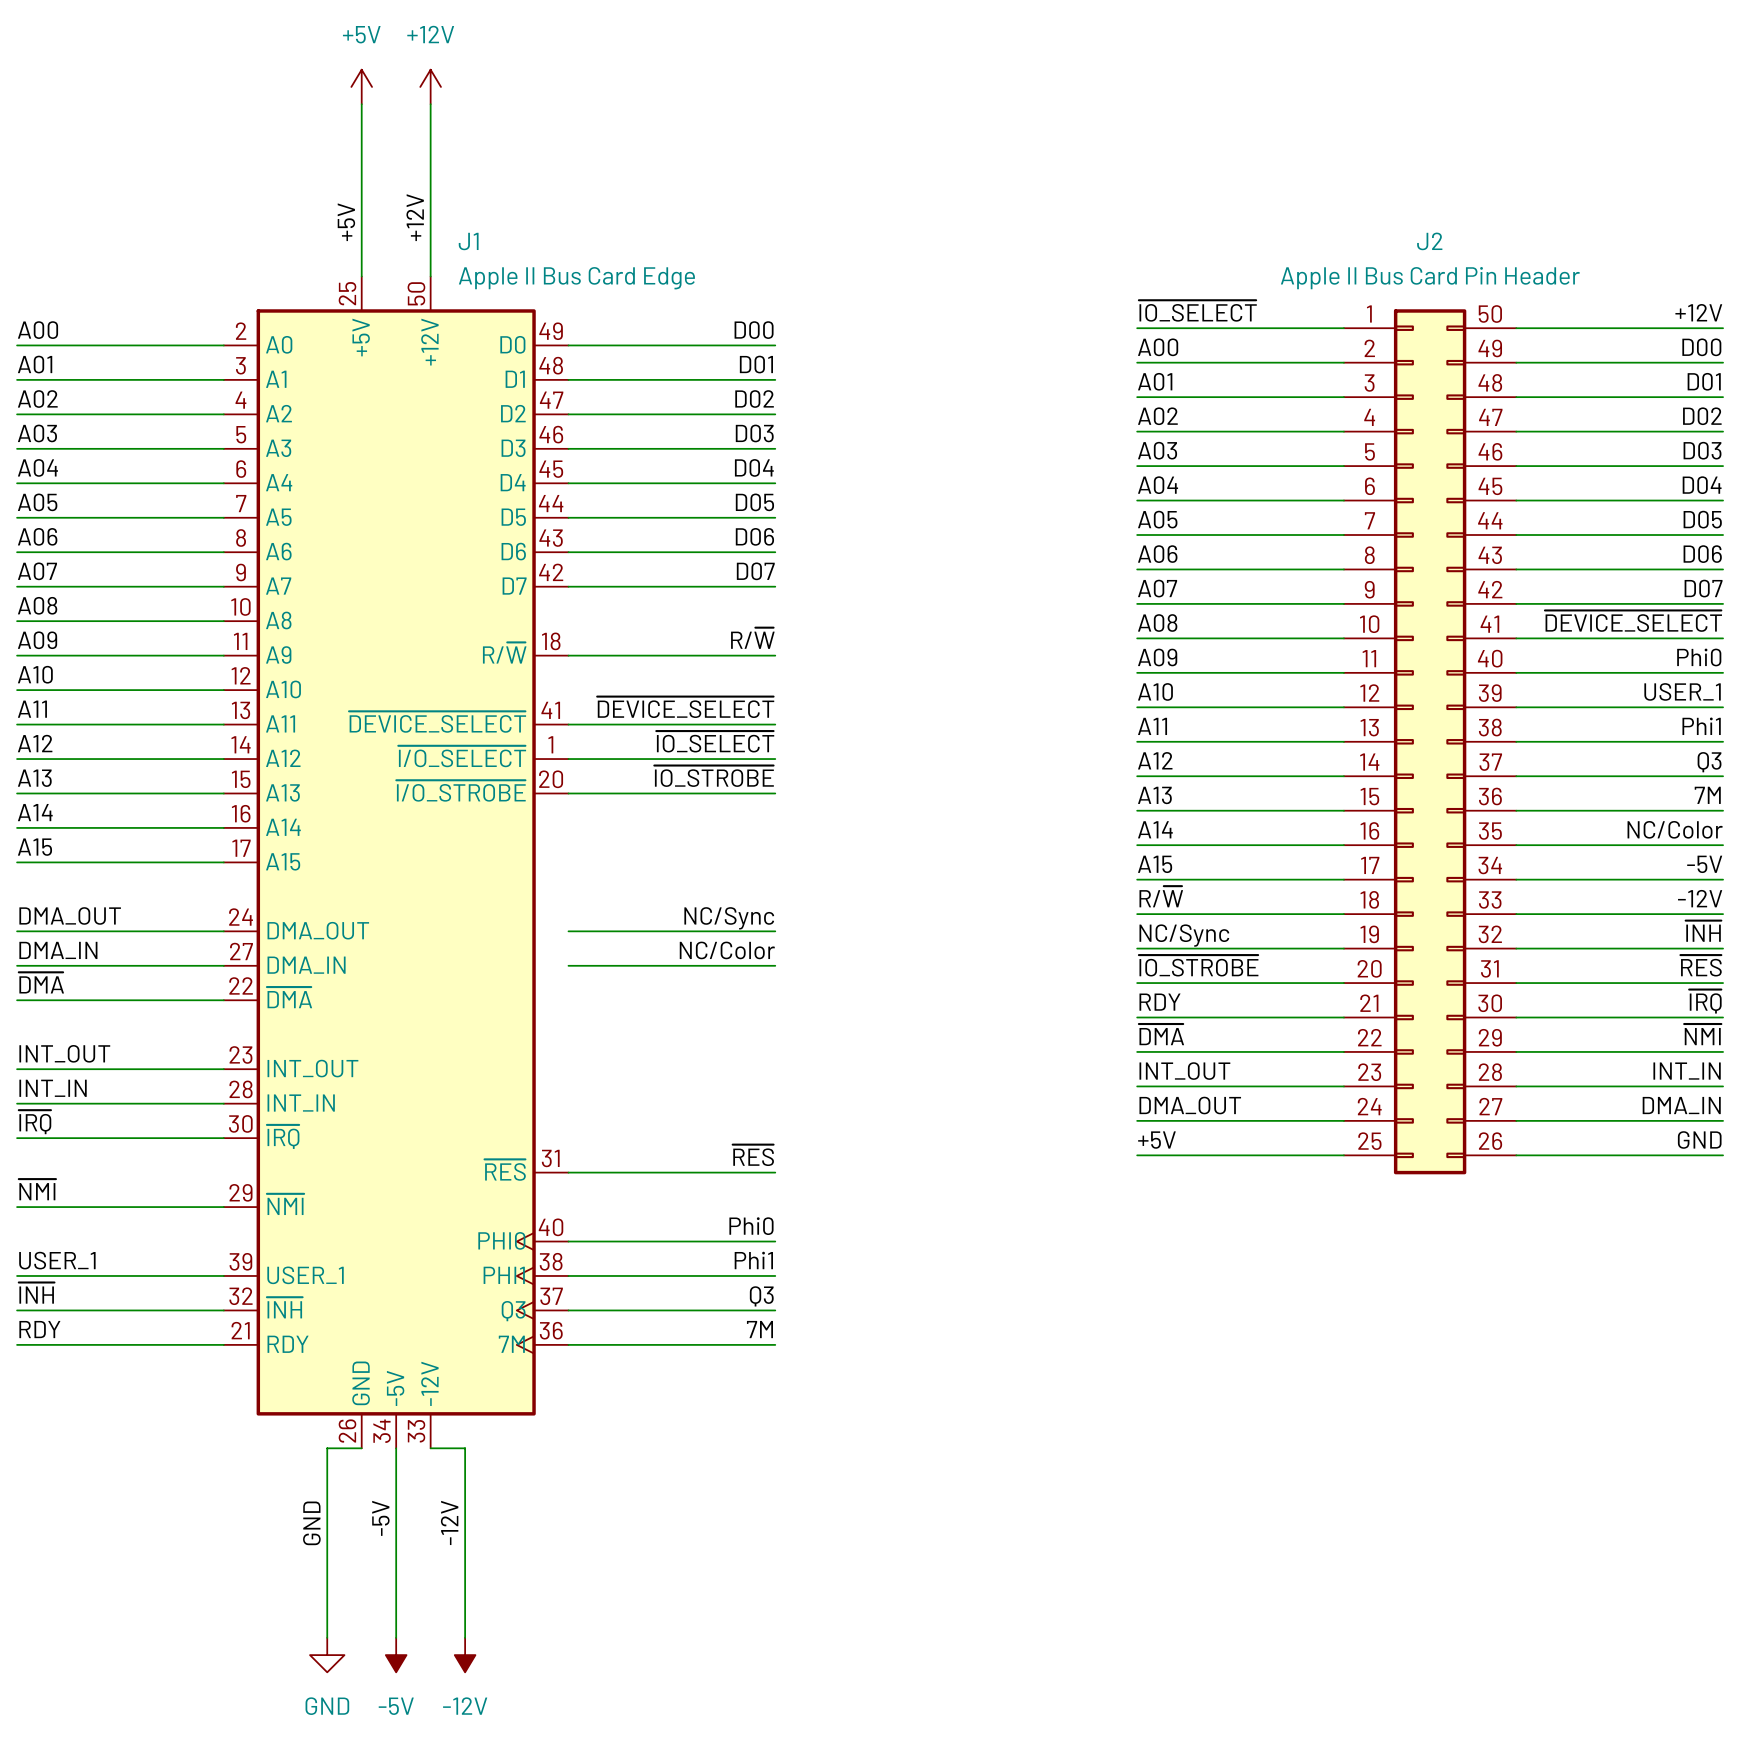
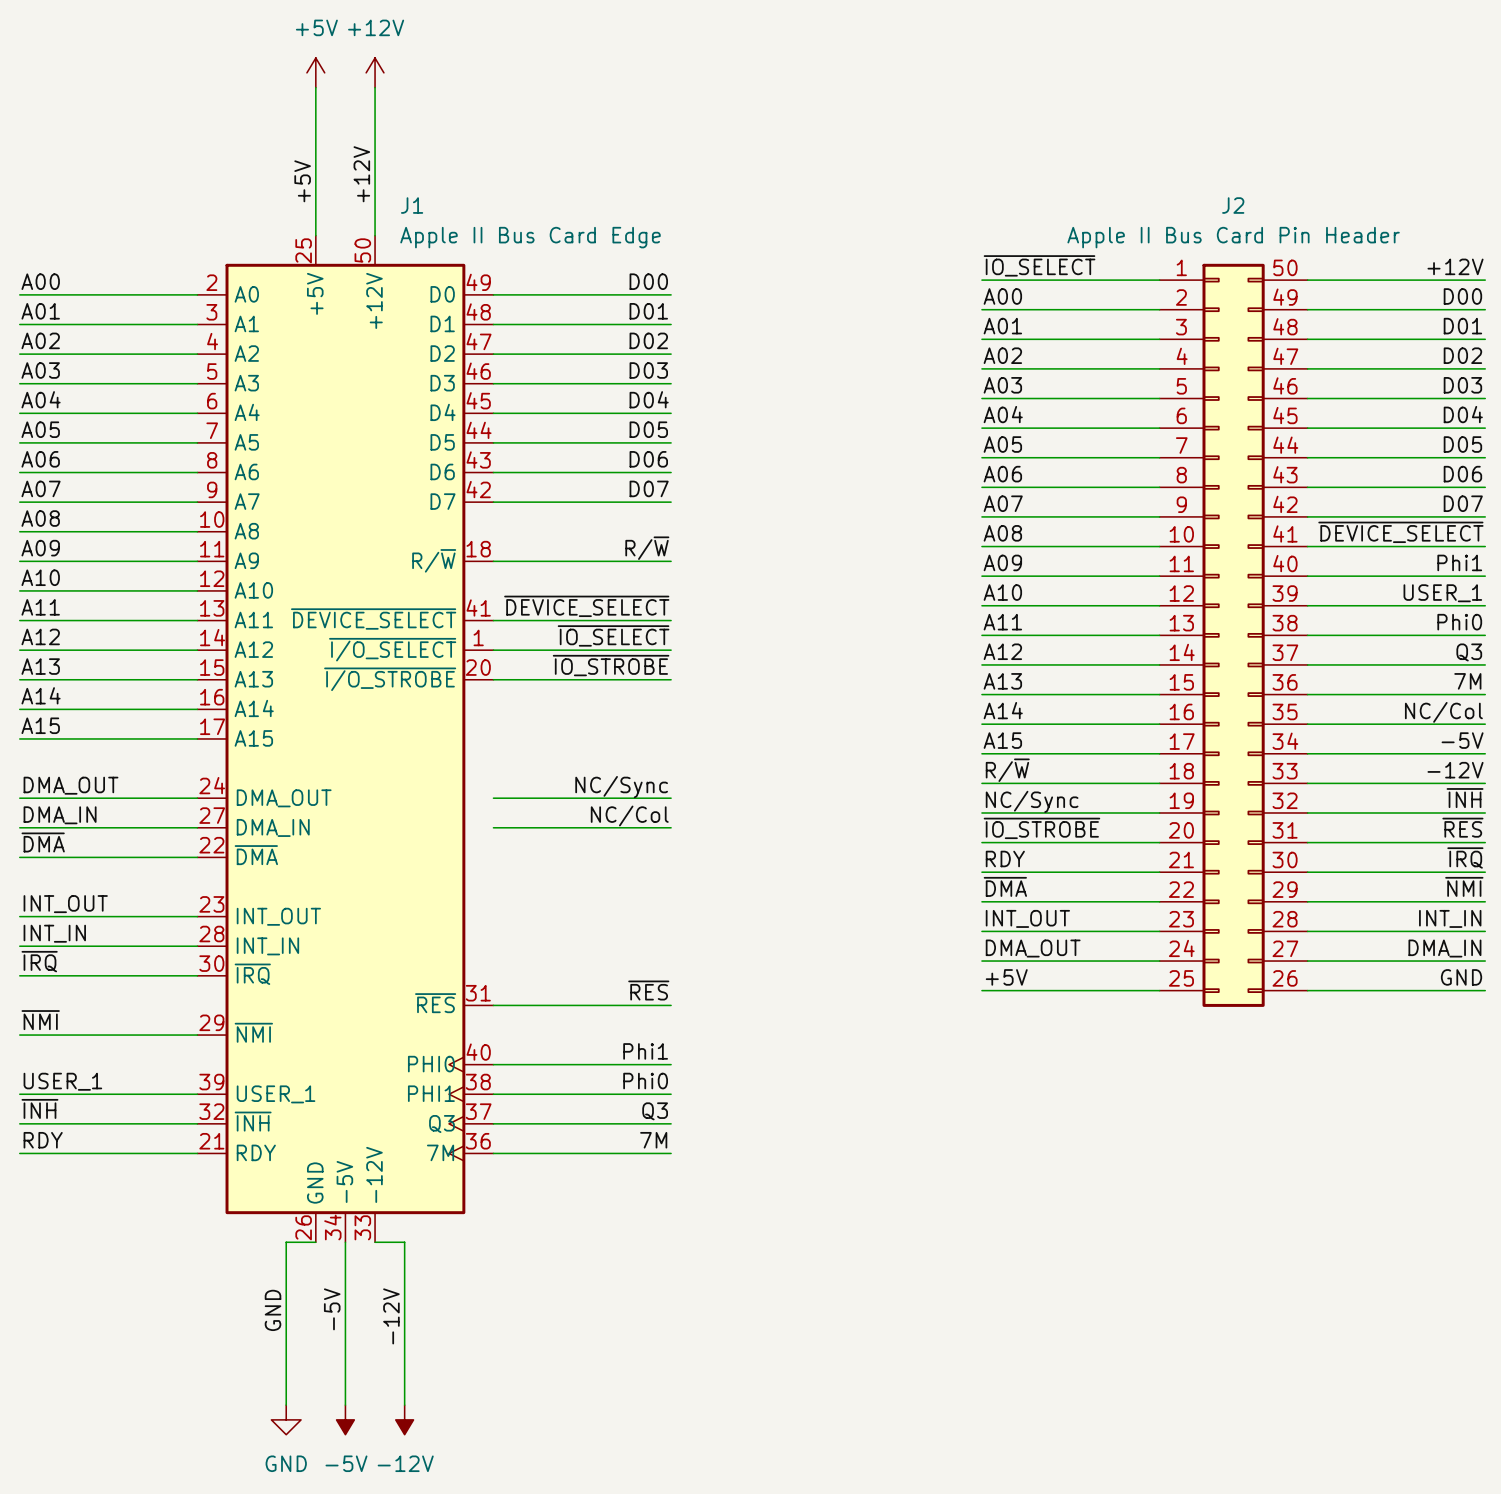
label: Phi0 (1699, 657) -> Phi1 (1459, 562)
label: Phi1 (1701, 726) -> Phi0 (1459, 622)
label: NC/Color (1675, 829) -> NC/Col (1443, 712)
label: NC/Color (727, 950) -> NC/Col (629, 815)
label: Phi0 (751, 1226) -> Phi1 (645, 1051)
label: Phi1 (753, 1260) -> Phi0 (645, 1081)

